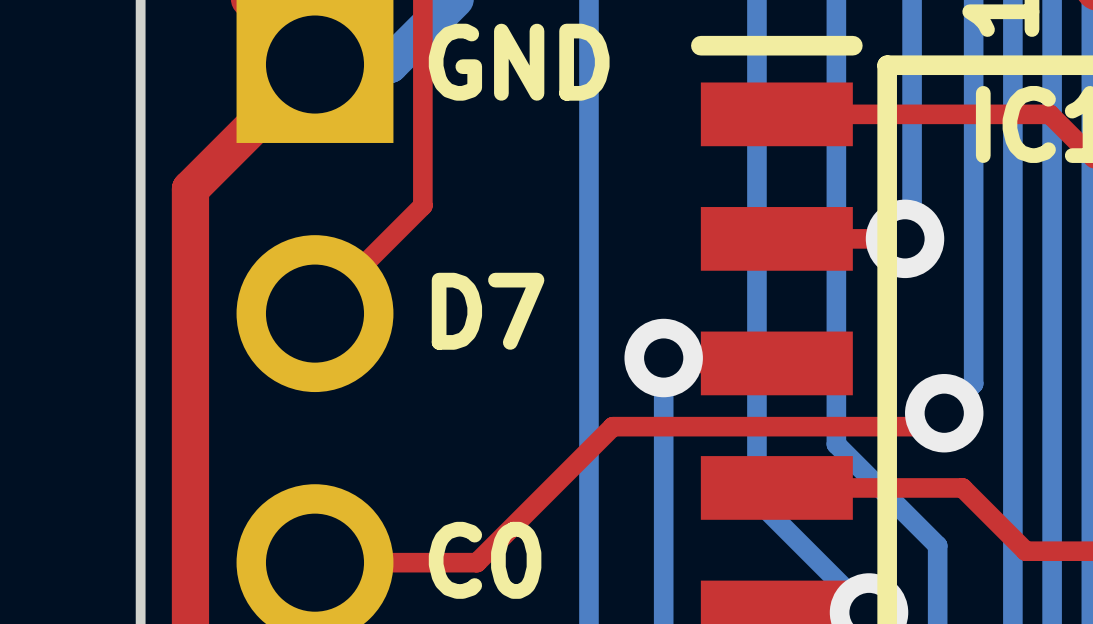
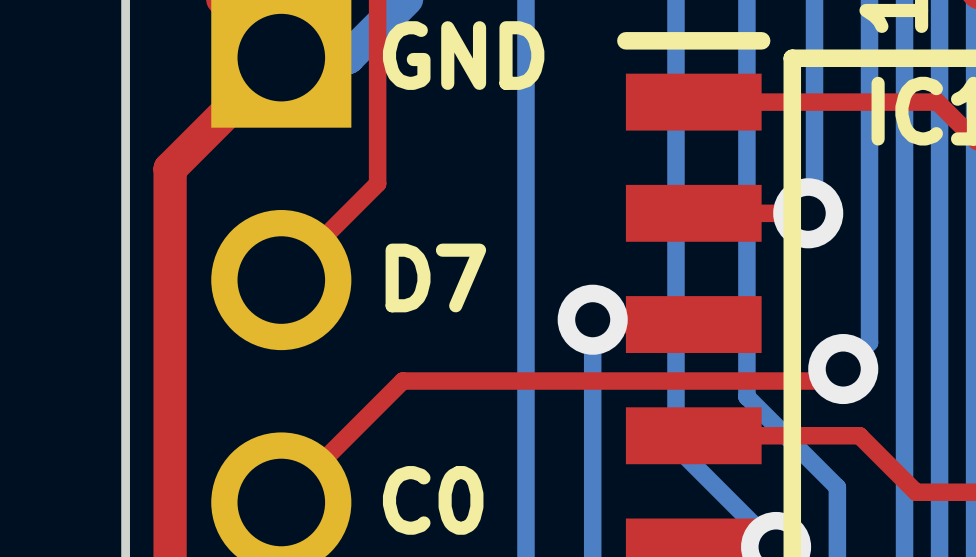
top track: (612, 426) (476, 562) (314, 562) -> (547, 381) (402, 381) (281, 502)

